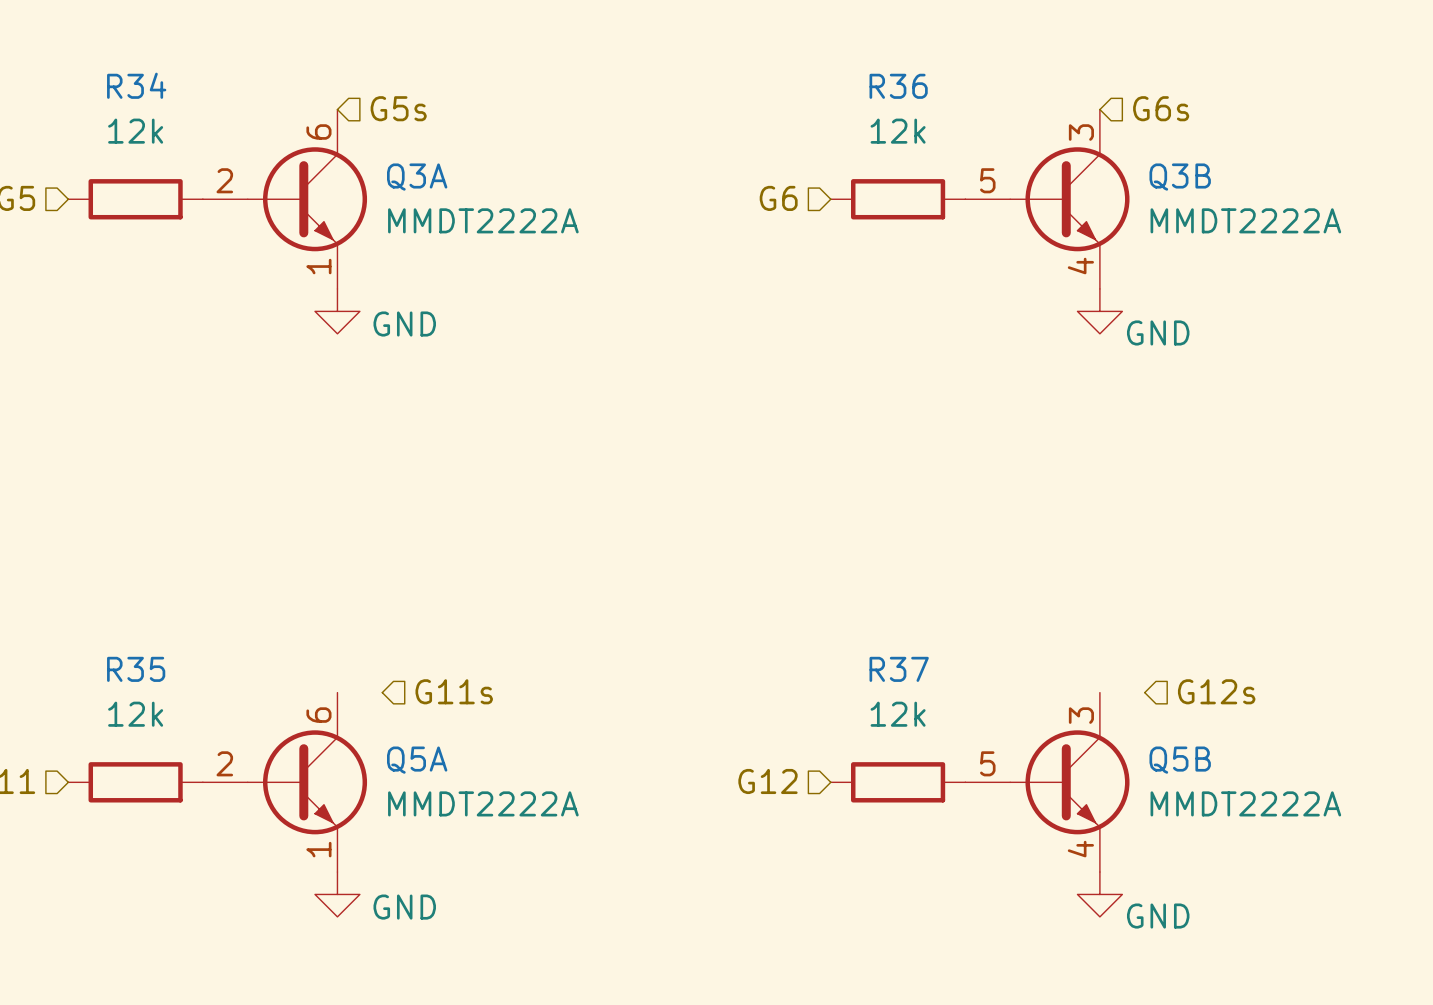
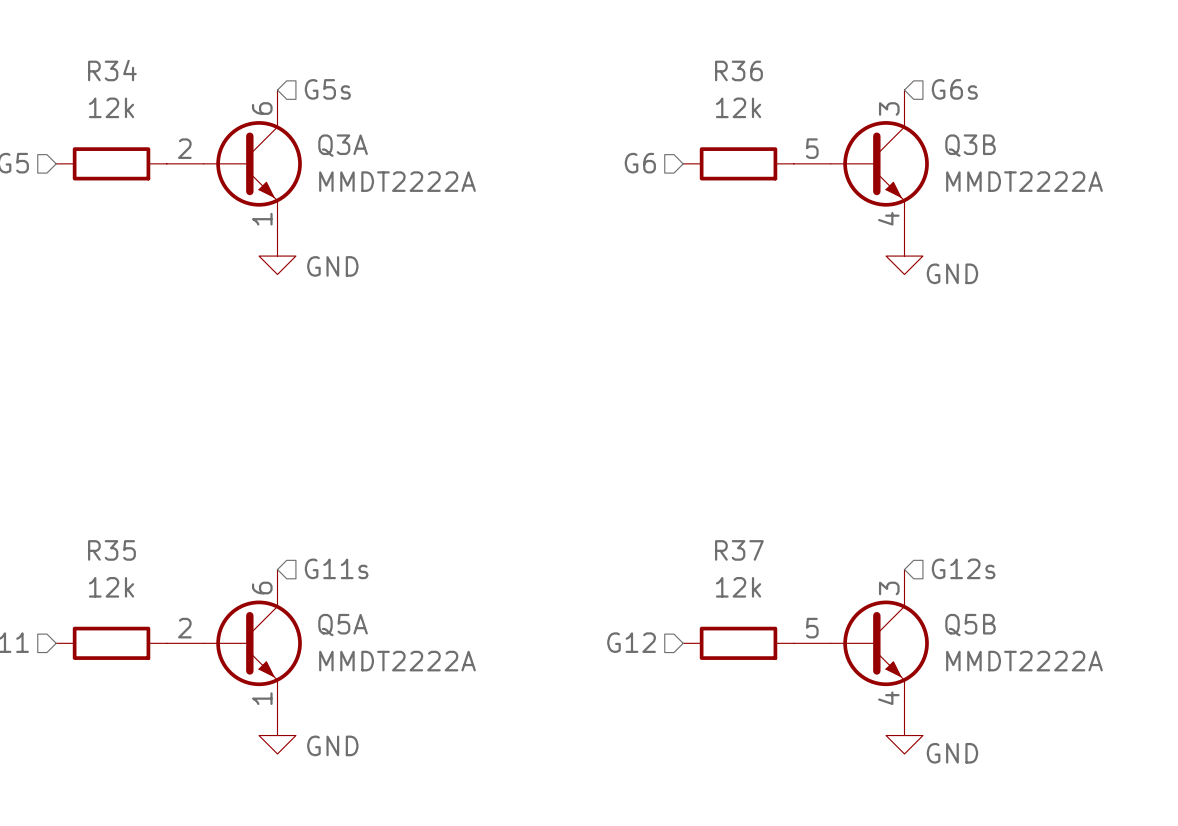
hierarchical label position: G11s (454, 691) -> G11s (336, 568)
hierarchical label position: G12s (1216, 691) -> G12s (963, 568)

